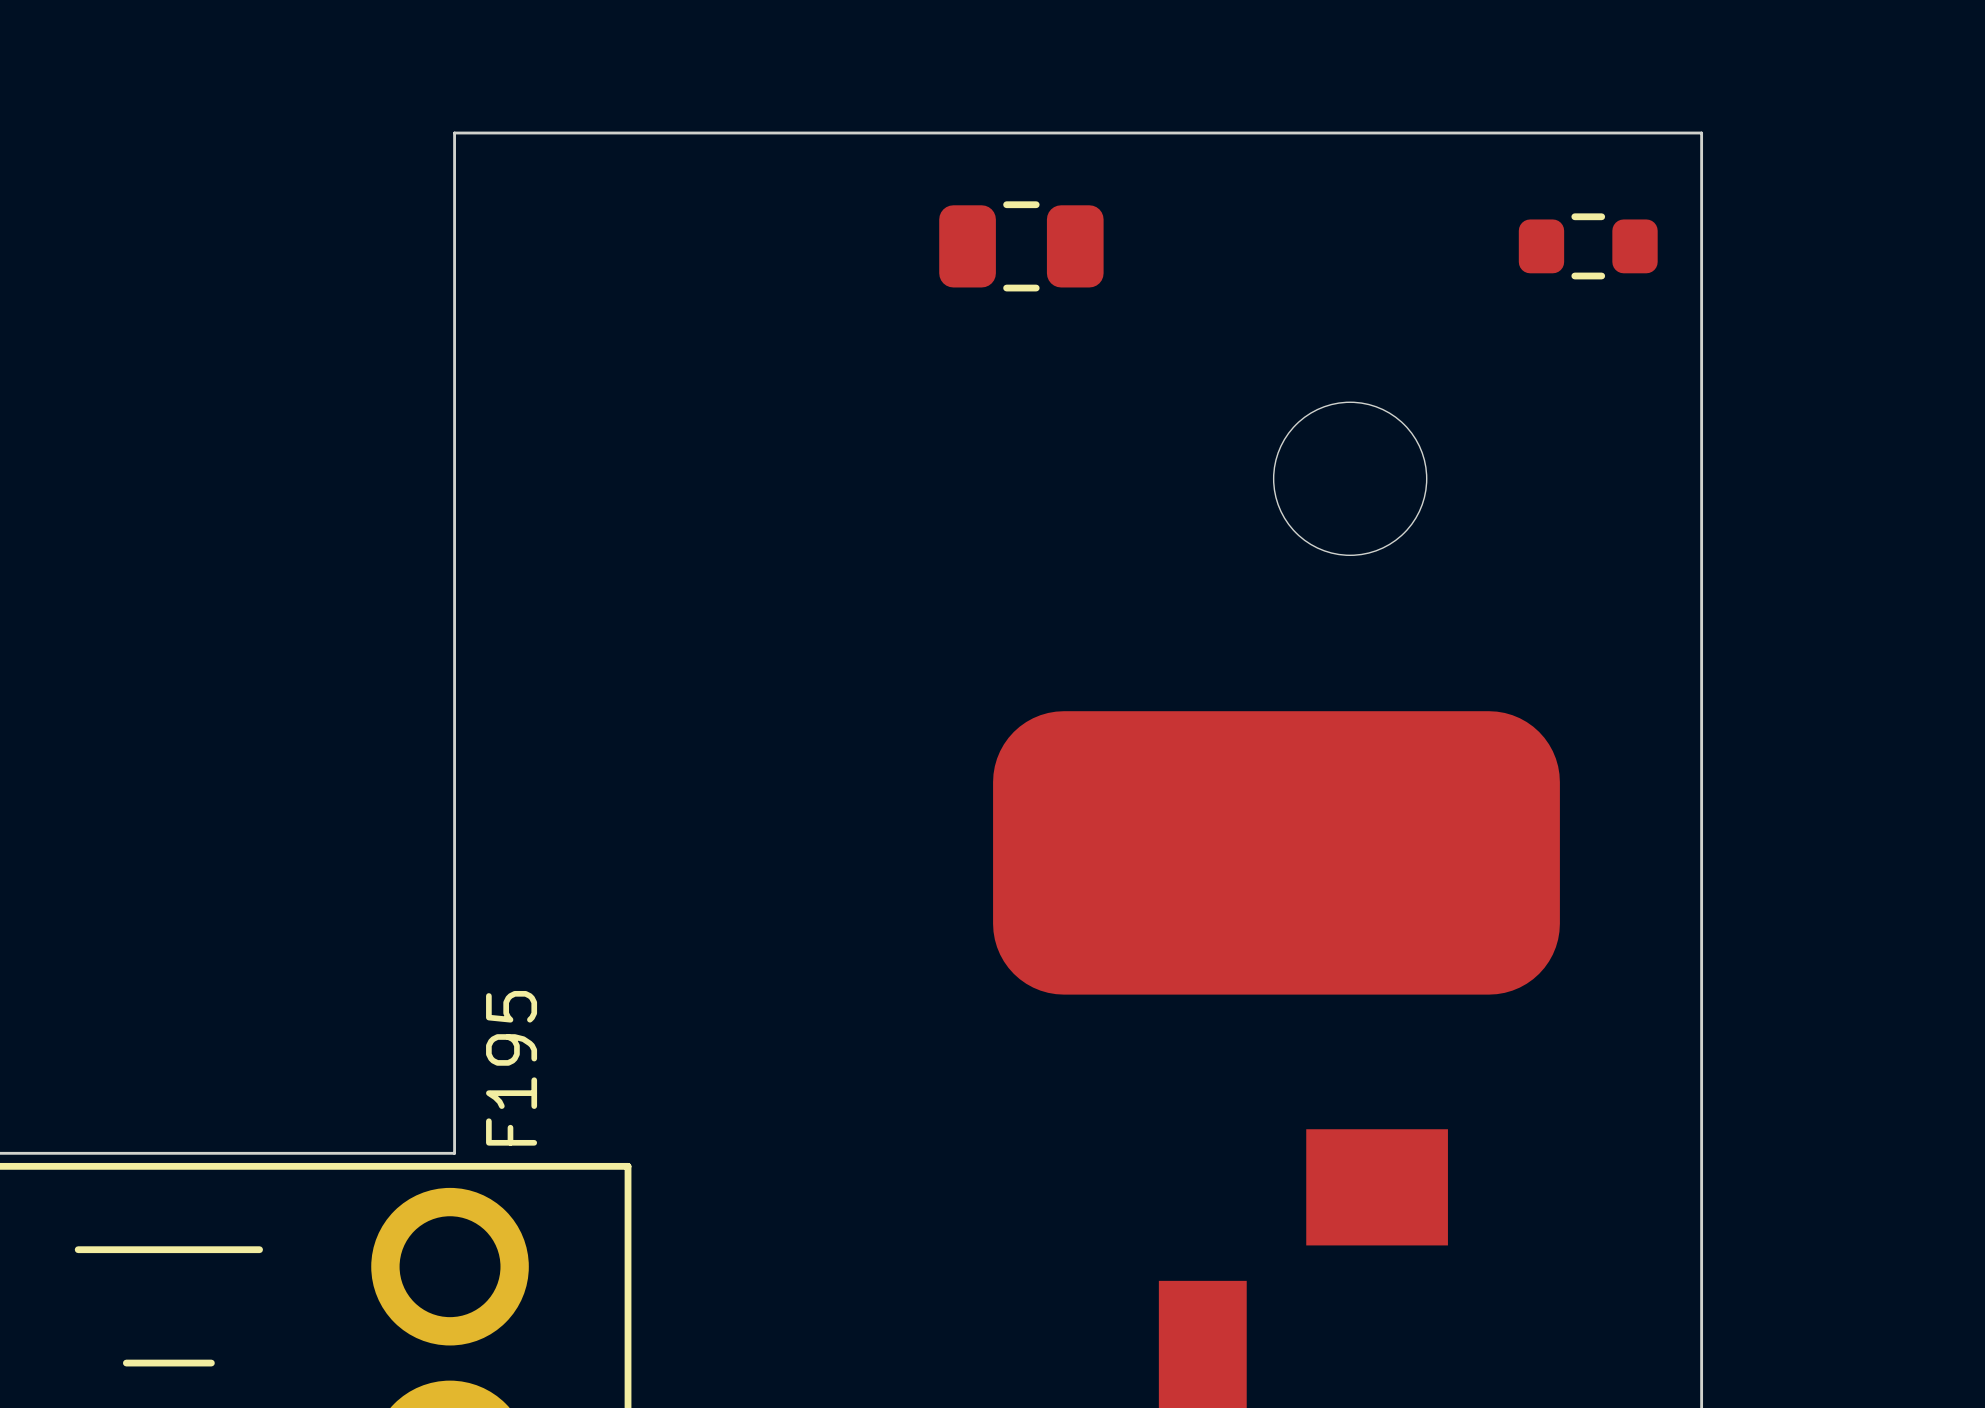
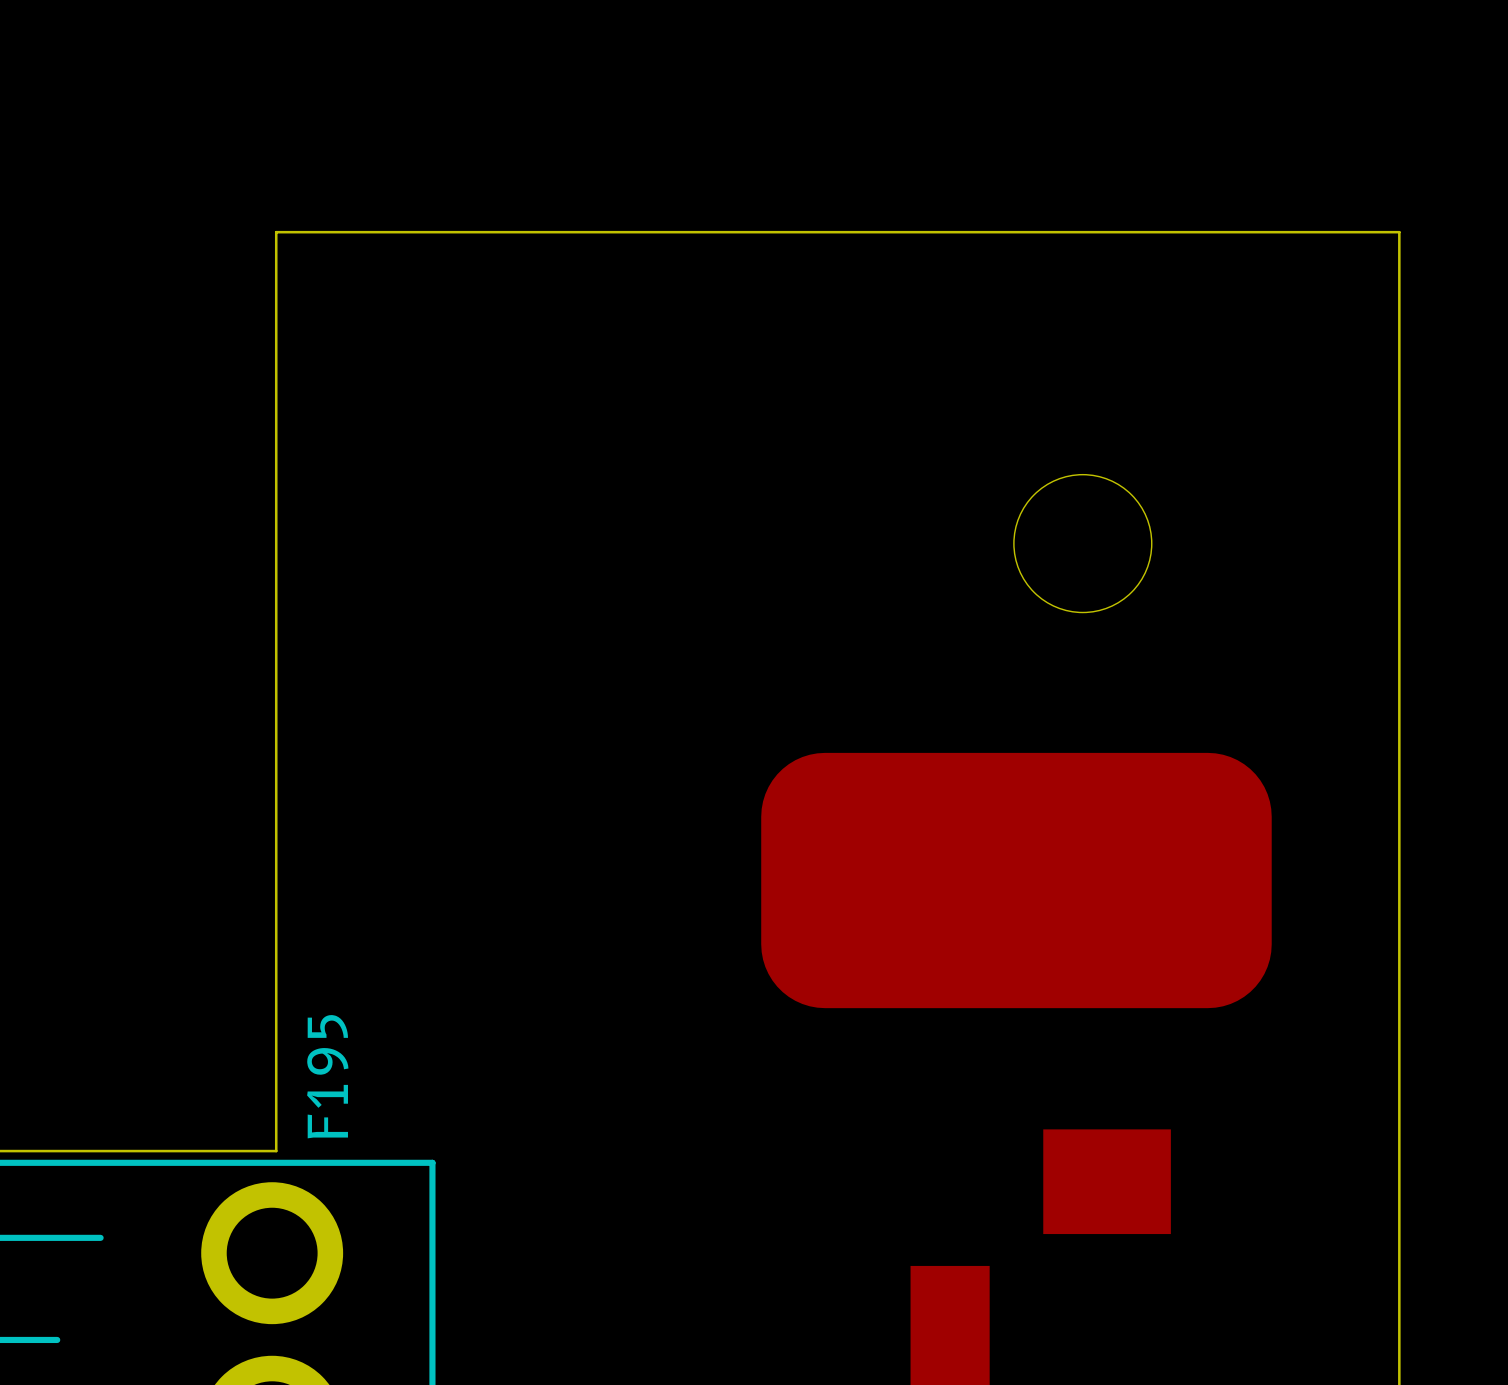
part: (1021, 246) -> none
part: (1588, 246) -> none

